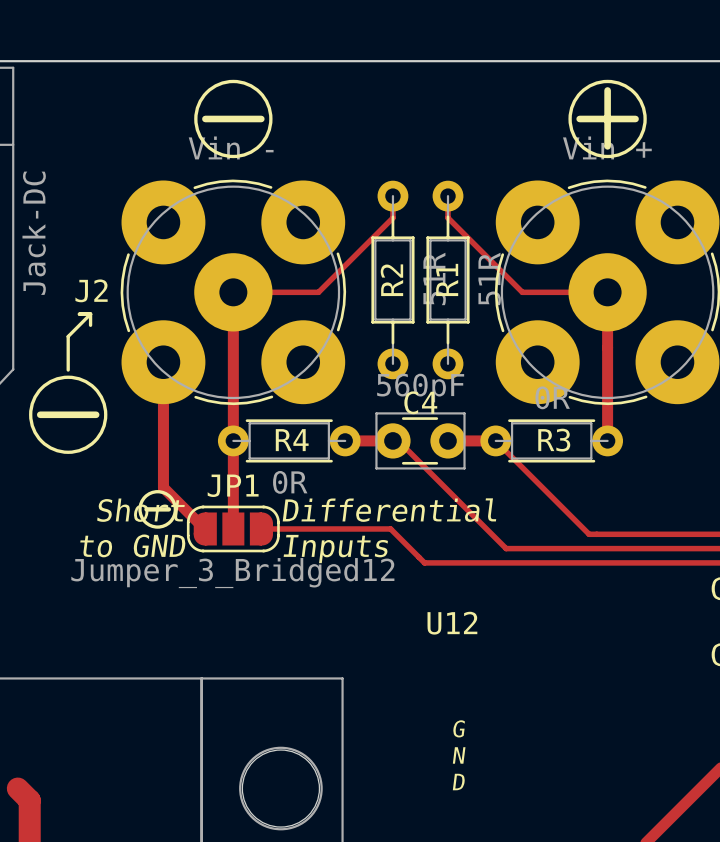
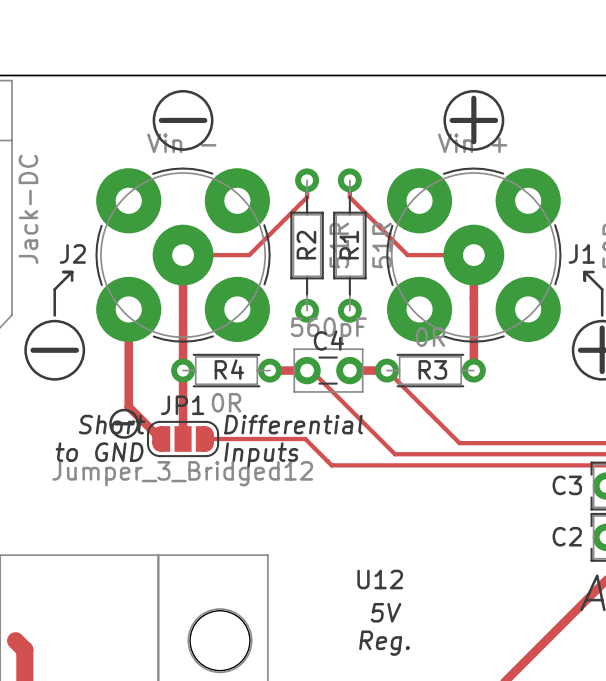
C4 footprint: [375, 412, 466, 470] -> [293, 348, 364, 393]
U12 name position: U12 (452, 623) -> U12 (380, 579)
text: G (458, 728) -> none
text: none -> 5V (386, 612)
text: N (459, 755) -> none
text: D (458, 782) -> none
text: none -> Reg. (384, 643)

